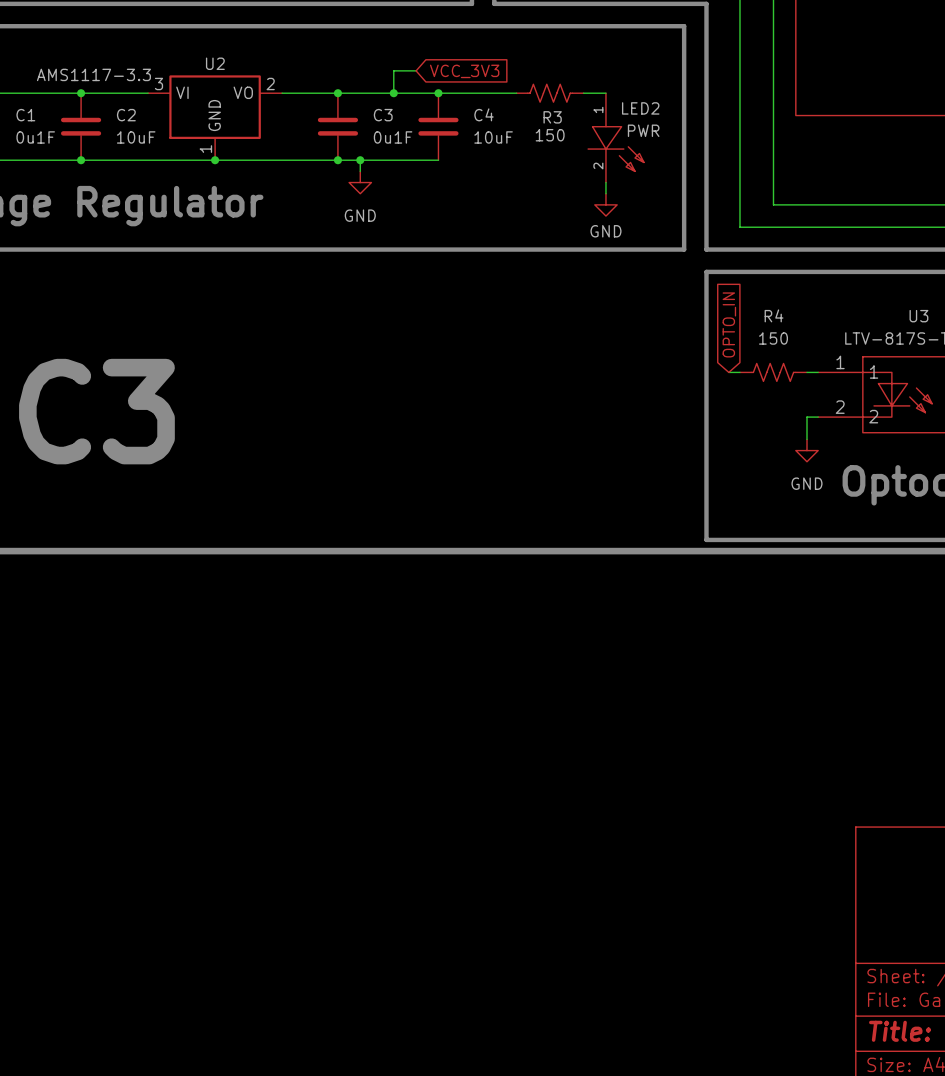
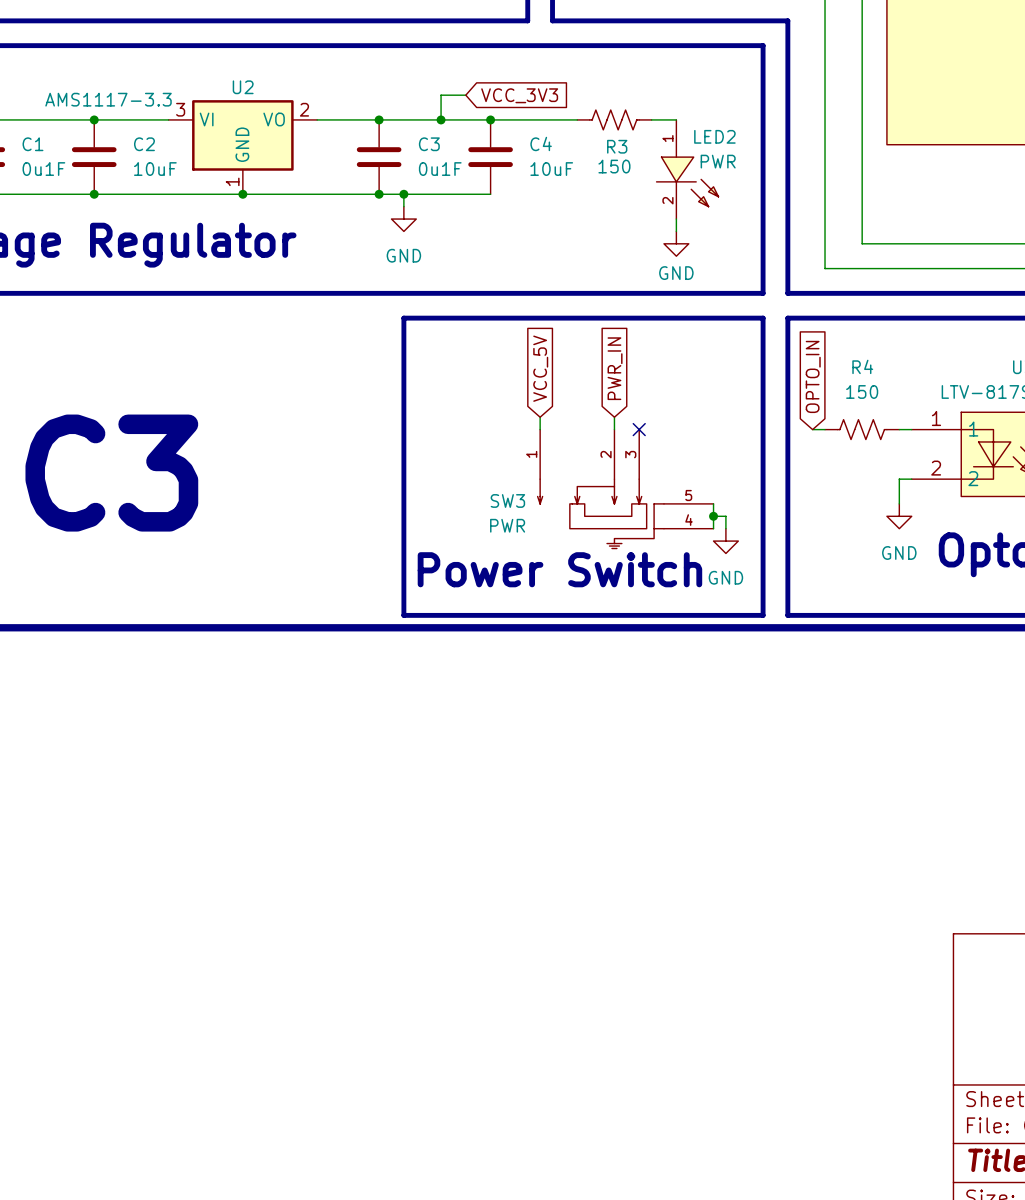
line: none -> (403, 318) (763, 318) (763, 615) (403, 615) (403, 318)
global label: none -> VCC_5V (540, 368)
global label: none -> PWR_IN (615, 368)
wire: none -> (540, 417) (540, 429)
wire: none -> (614, 417) (614, 429)
no-connect mark: none -> (639, 429)
SW3: none -> PWR (625, 489)
wire: none -> (713, 503) (713, 528)
wire: none -> (713, 516) (725, 516) (725, 528)
junction: none -> (713, 516)
power symbol: none -> GND (725, 541)
text: none -> Power Switch (559, 569)

